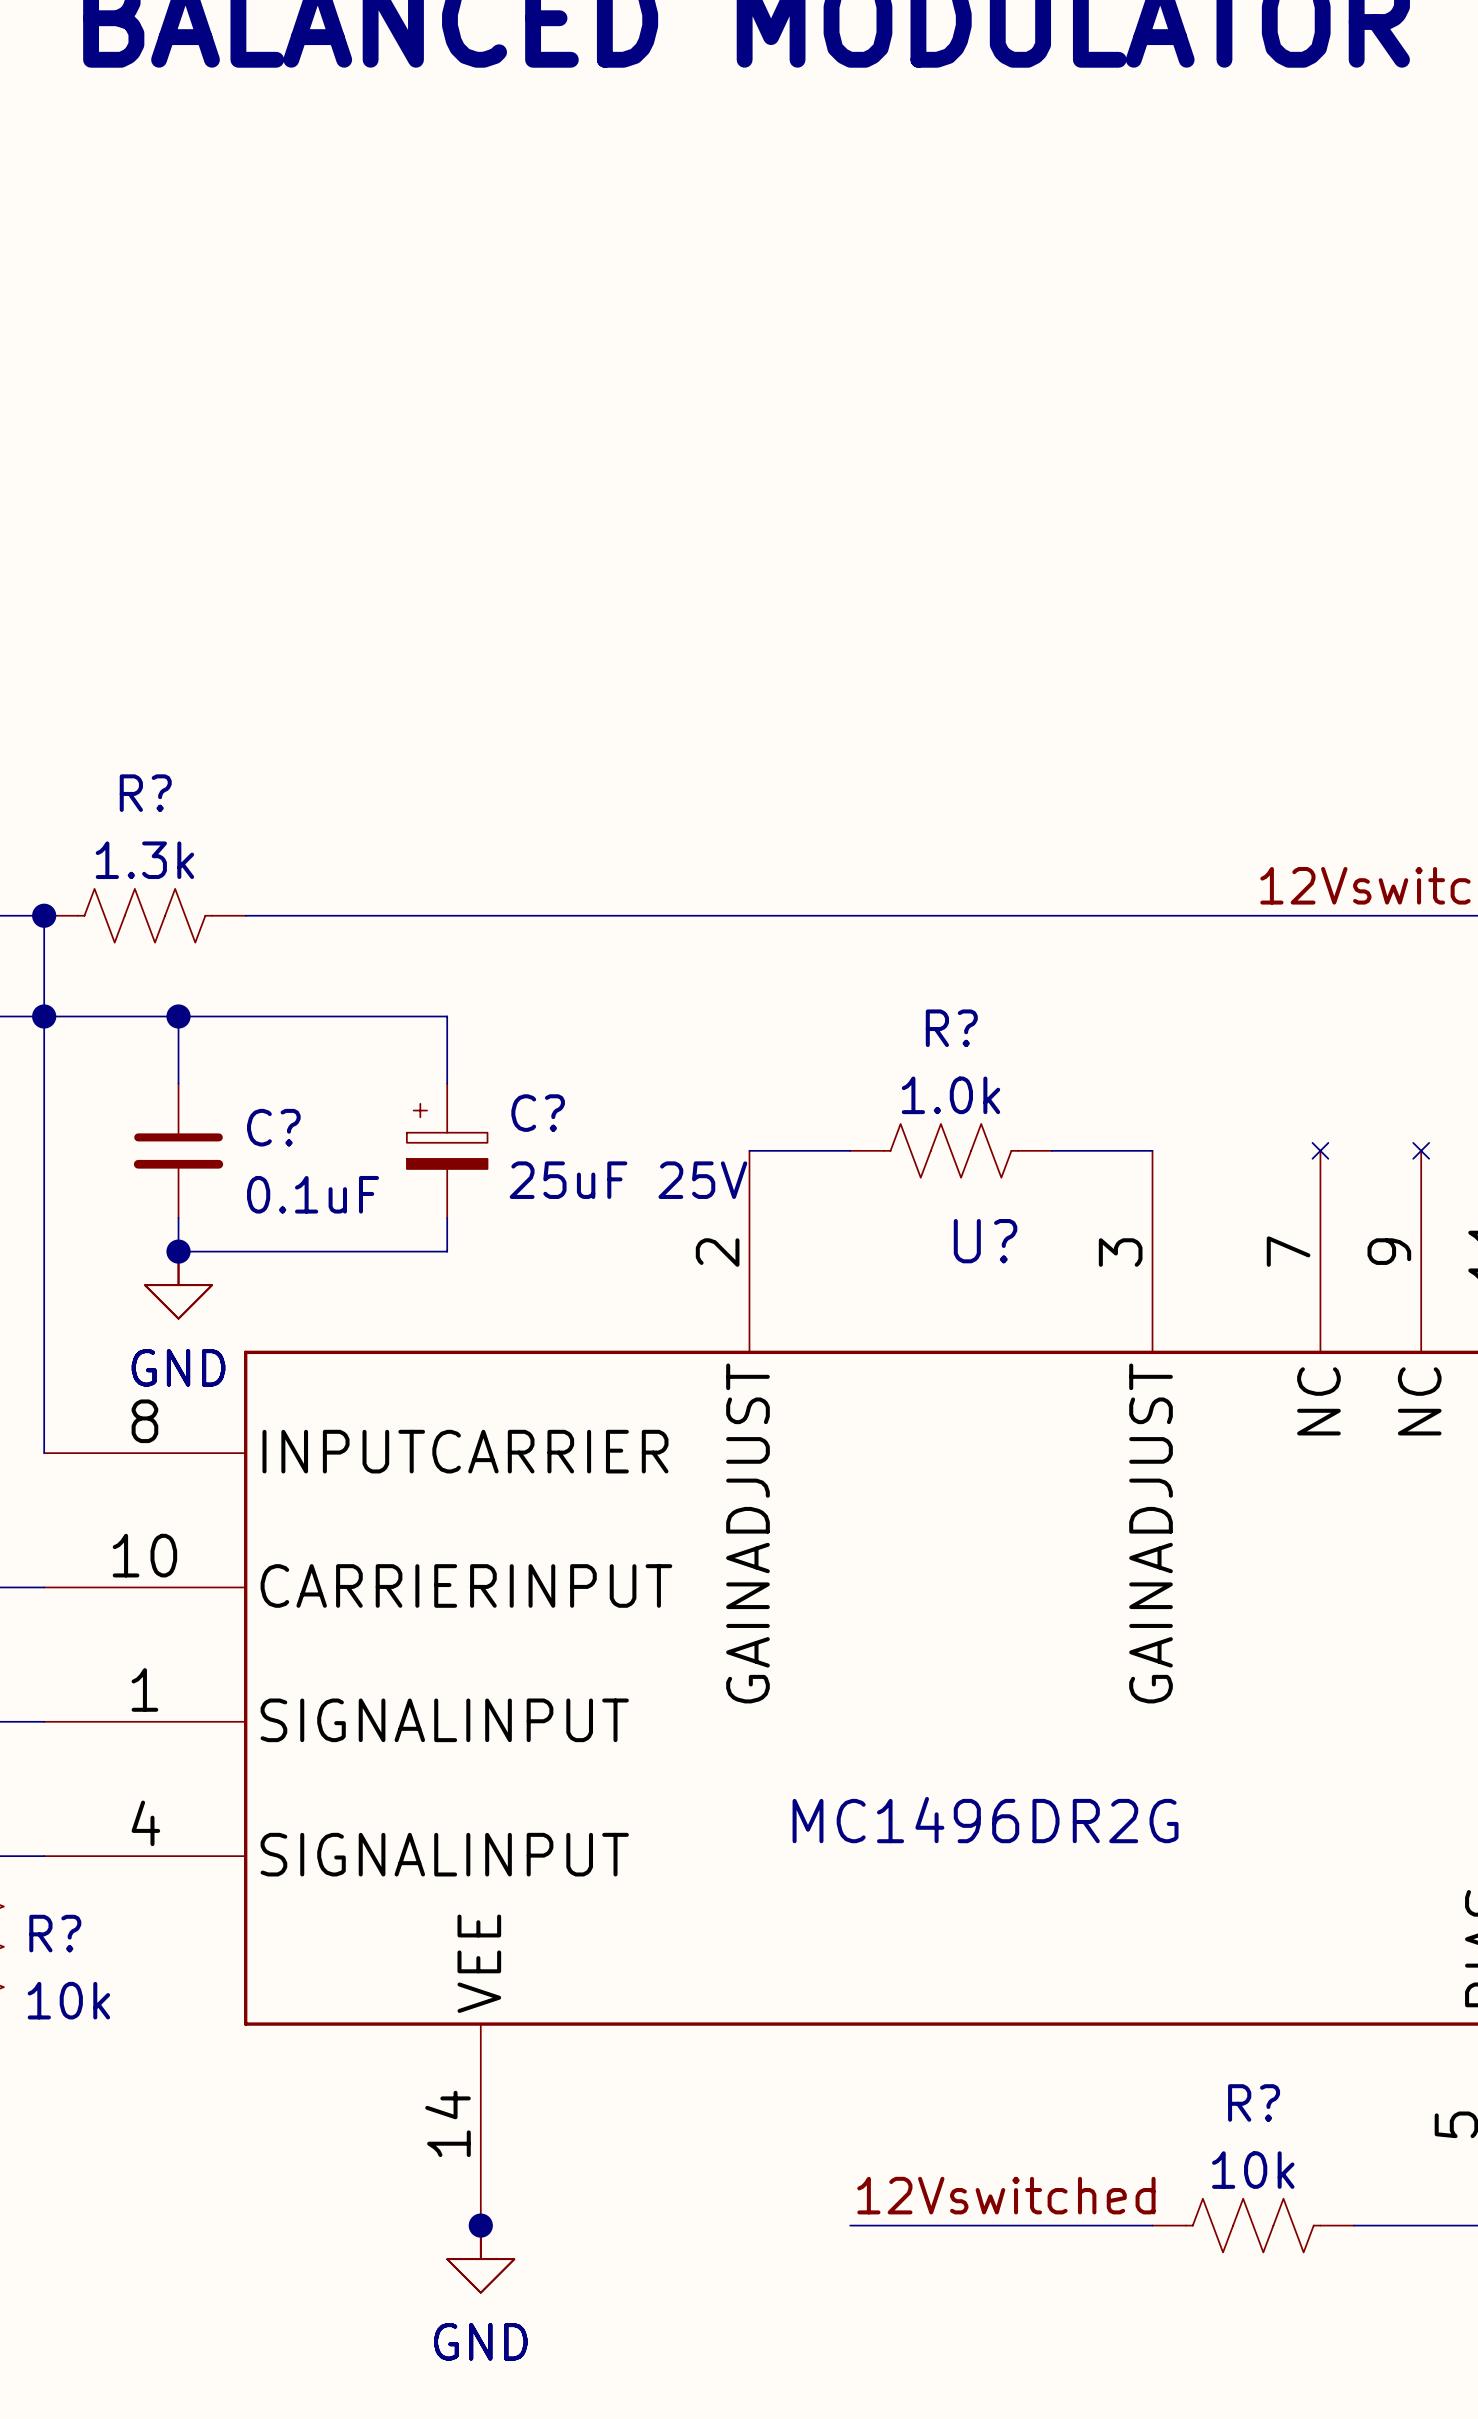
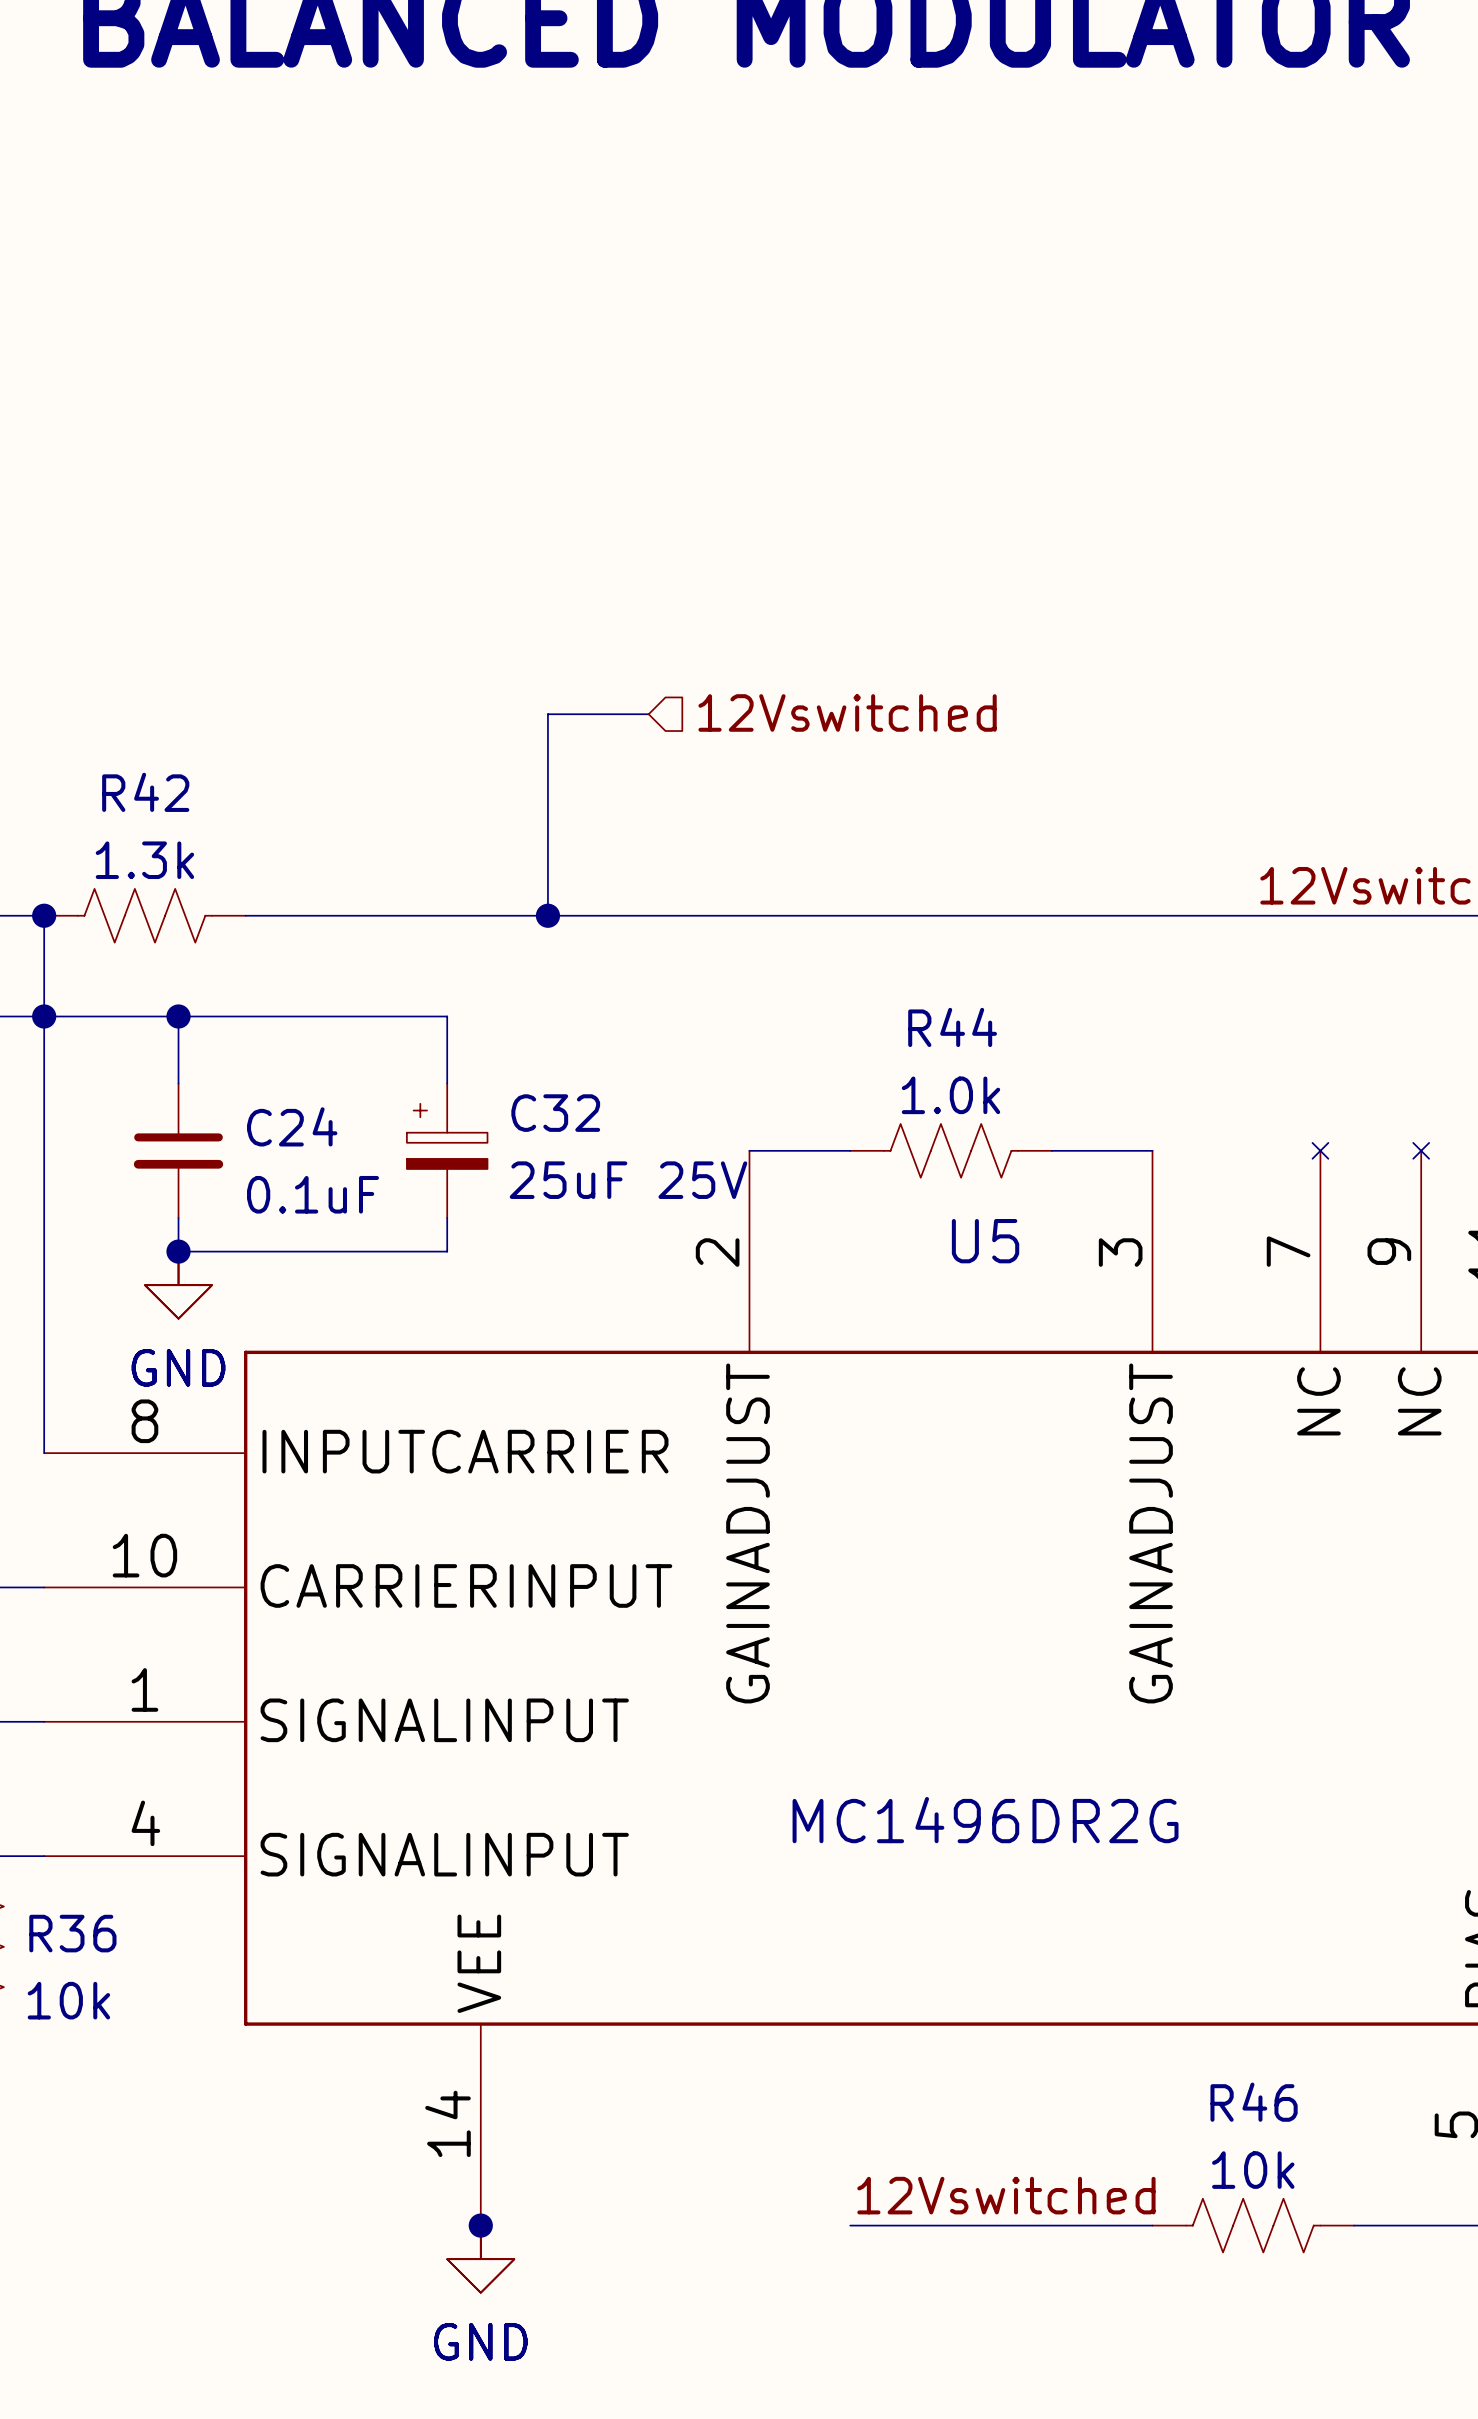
hierarchical label: none -> 12Vswitched (847, 712)
wire: none -> (648, 714) (547, 714) (547, 915)
R? name: R? (145, 793) -> R42 (145, 792)
junction: none -> (547, 915)
R? name: R? (951, 1028) -> R44 (952, 1027)
C? name: C? (538, 1113) -> C32 (555, 1113)
C? name: C? (273, 1127) -> C24 (292, 1126)
U? name: U? (985, 1241) -> U5 (985, 1241)
R? name: R? (55, 1933) -> R36 (72, 1933)
R? name: R? (1254, 2102) -> R46 (1254, 2102)

